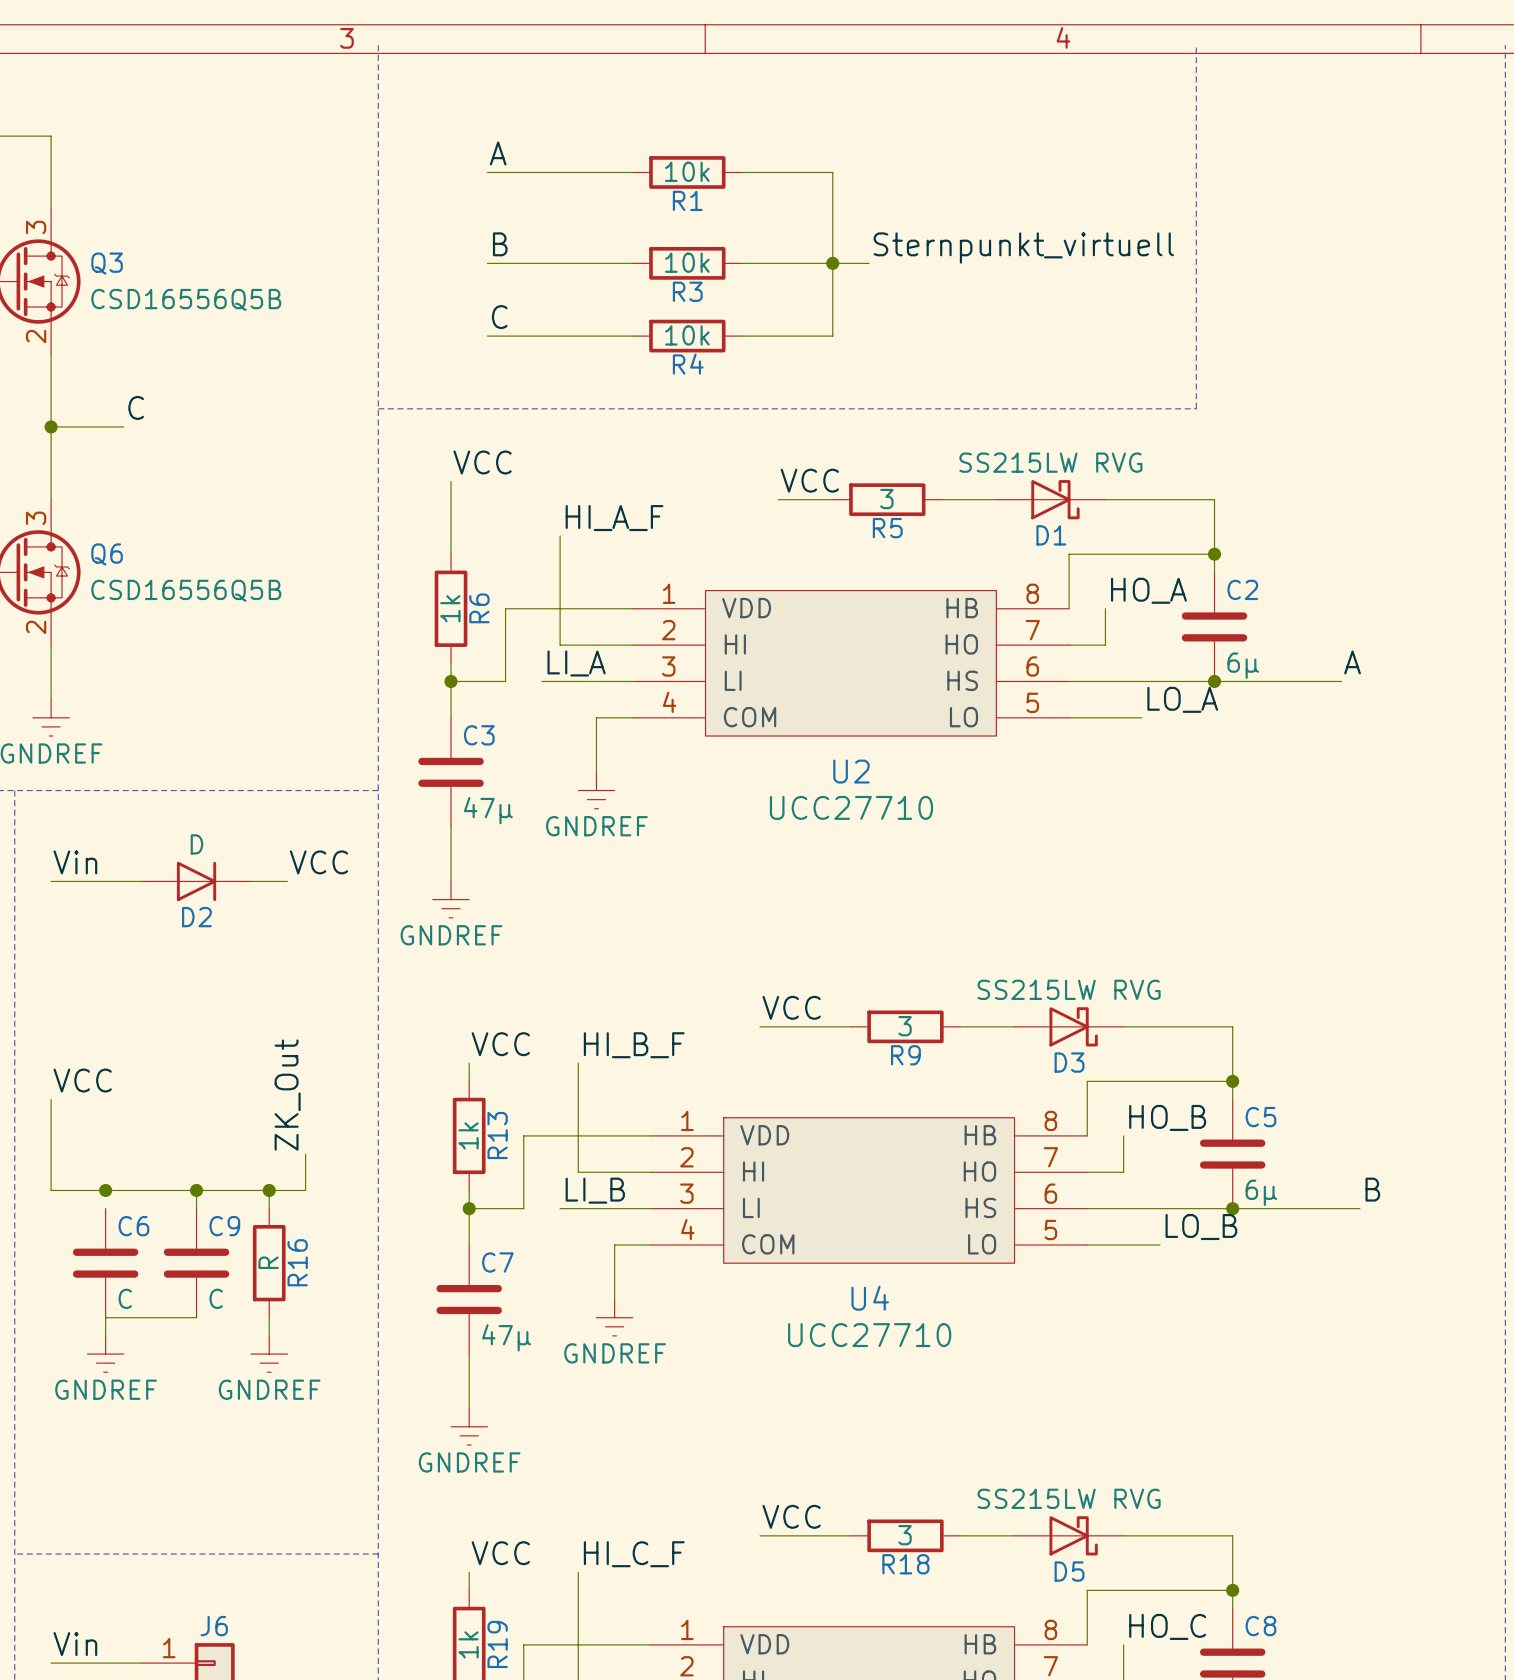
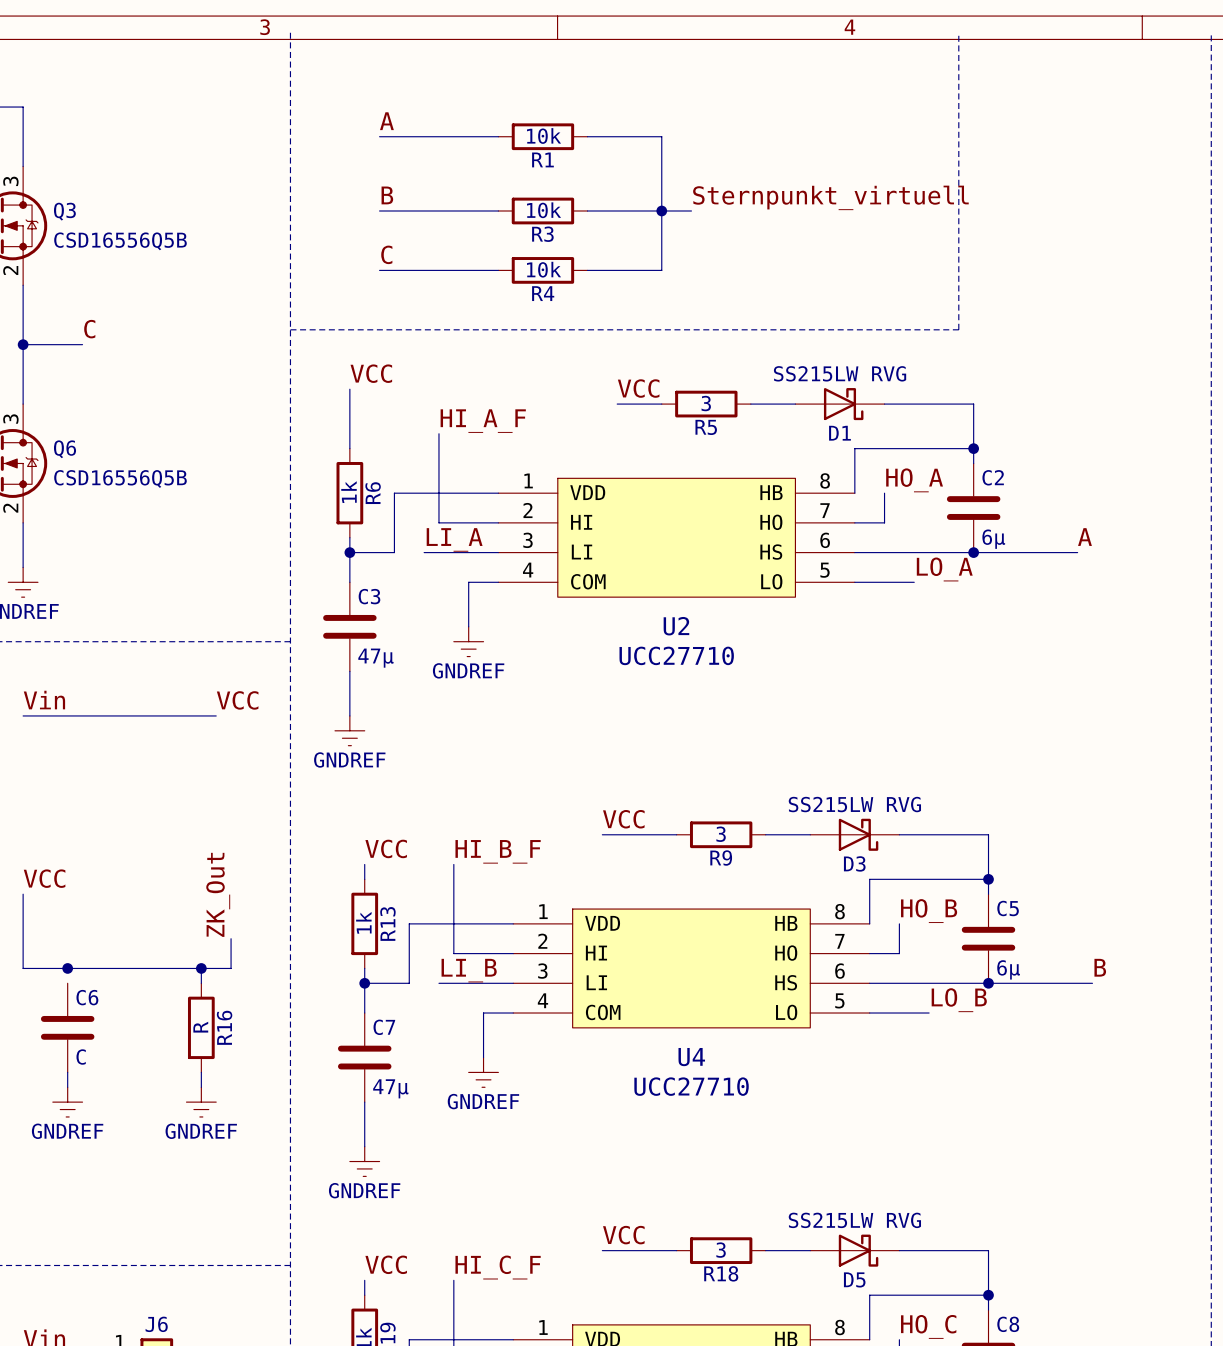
D2: D (196, 881) -> none
wire: (196, 1190) (196, 1208) -> none
junction: (196, 1190) -> none
C9: C (196, 1263) -> none
wire: (105, 1317) (196, 1317) -> none

